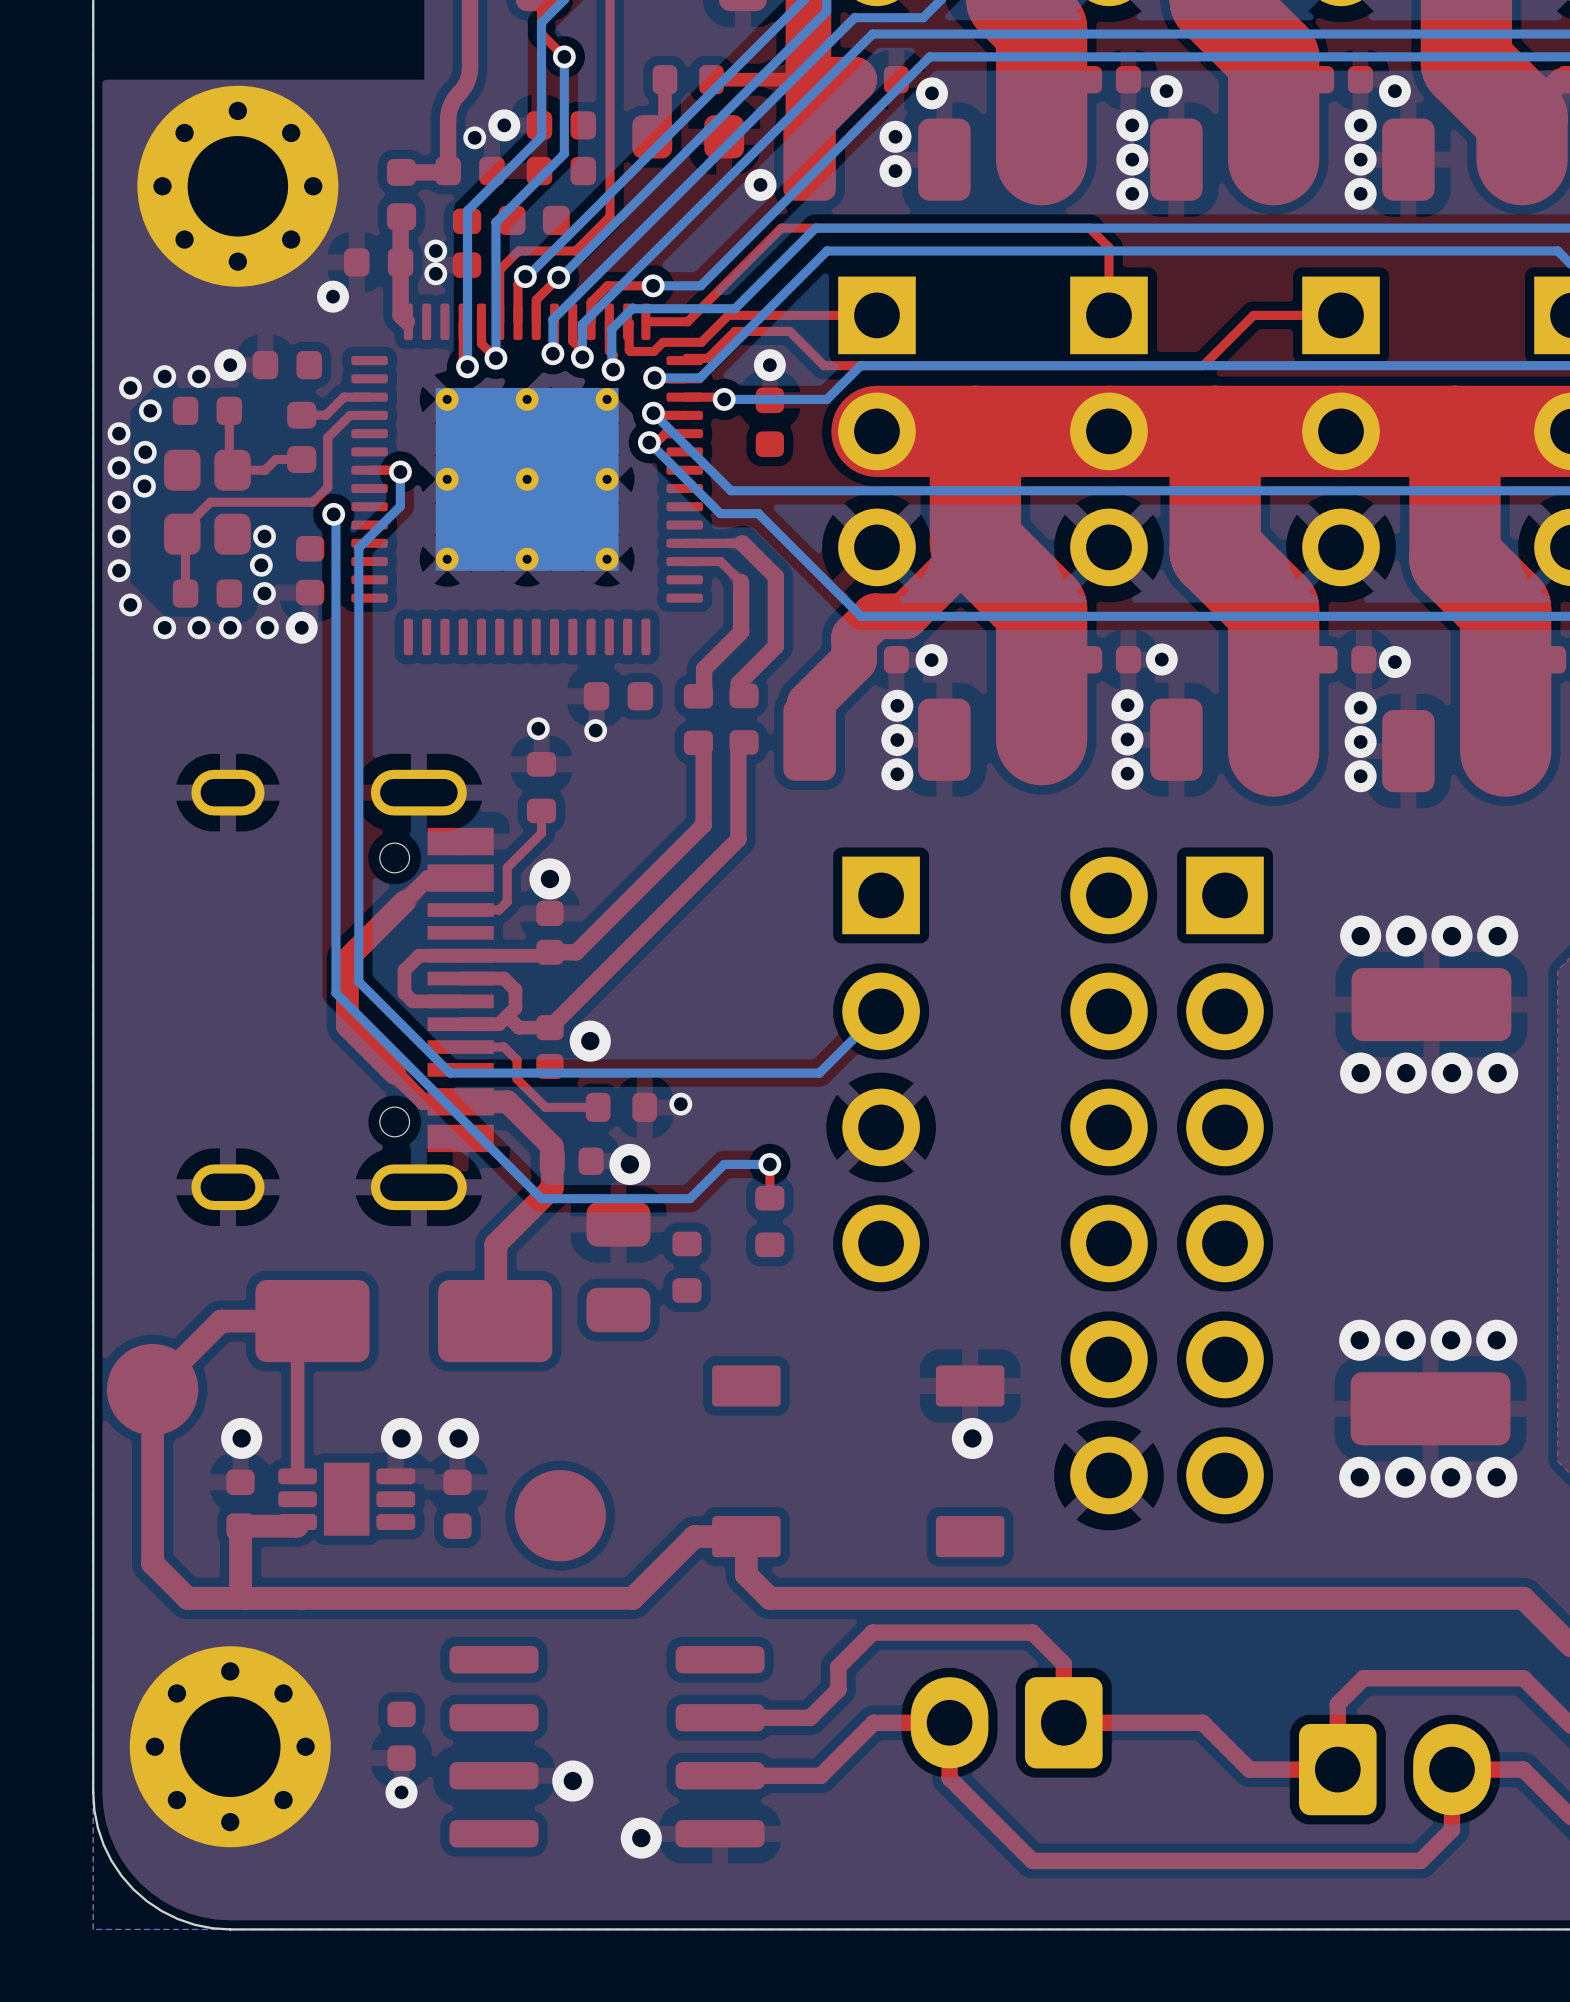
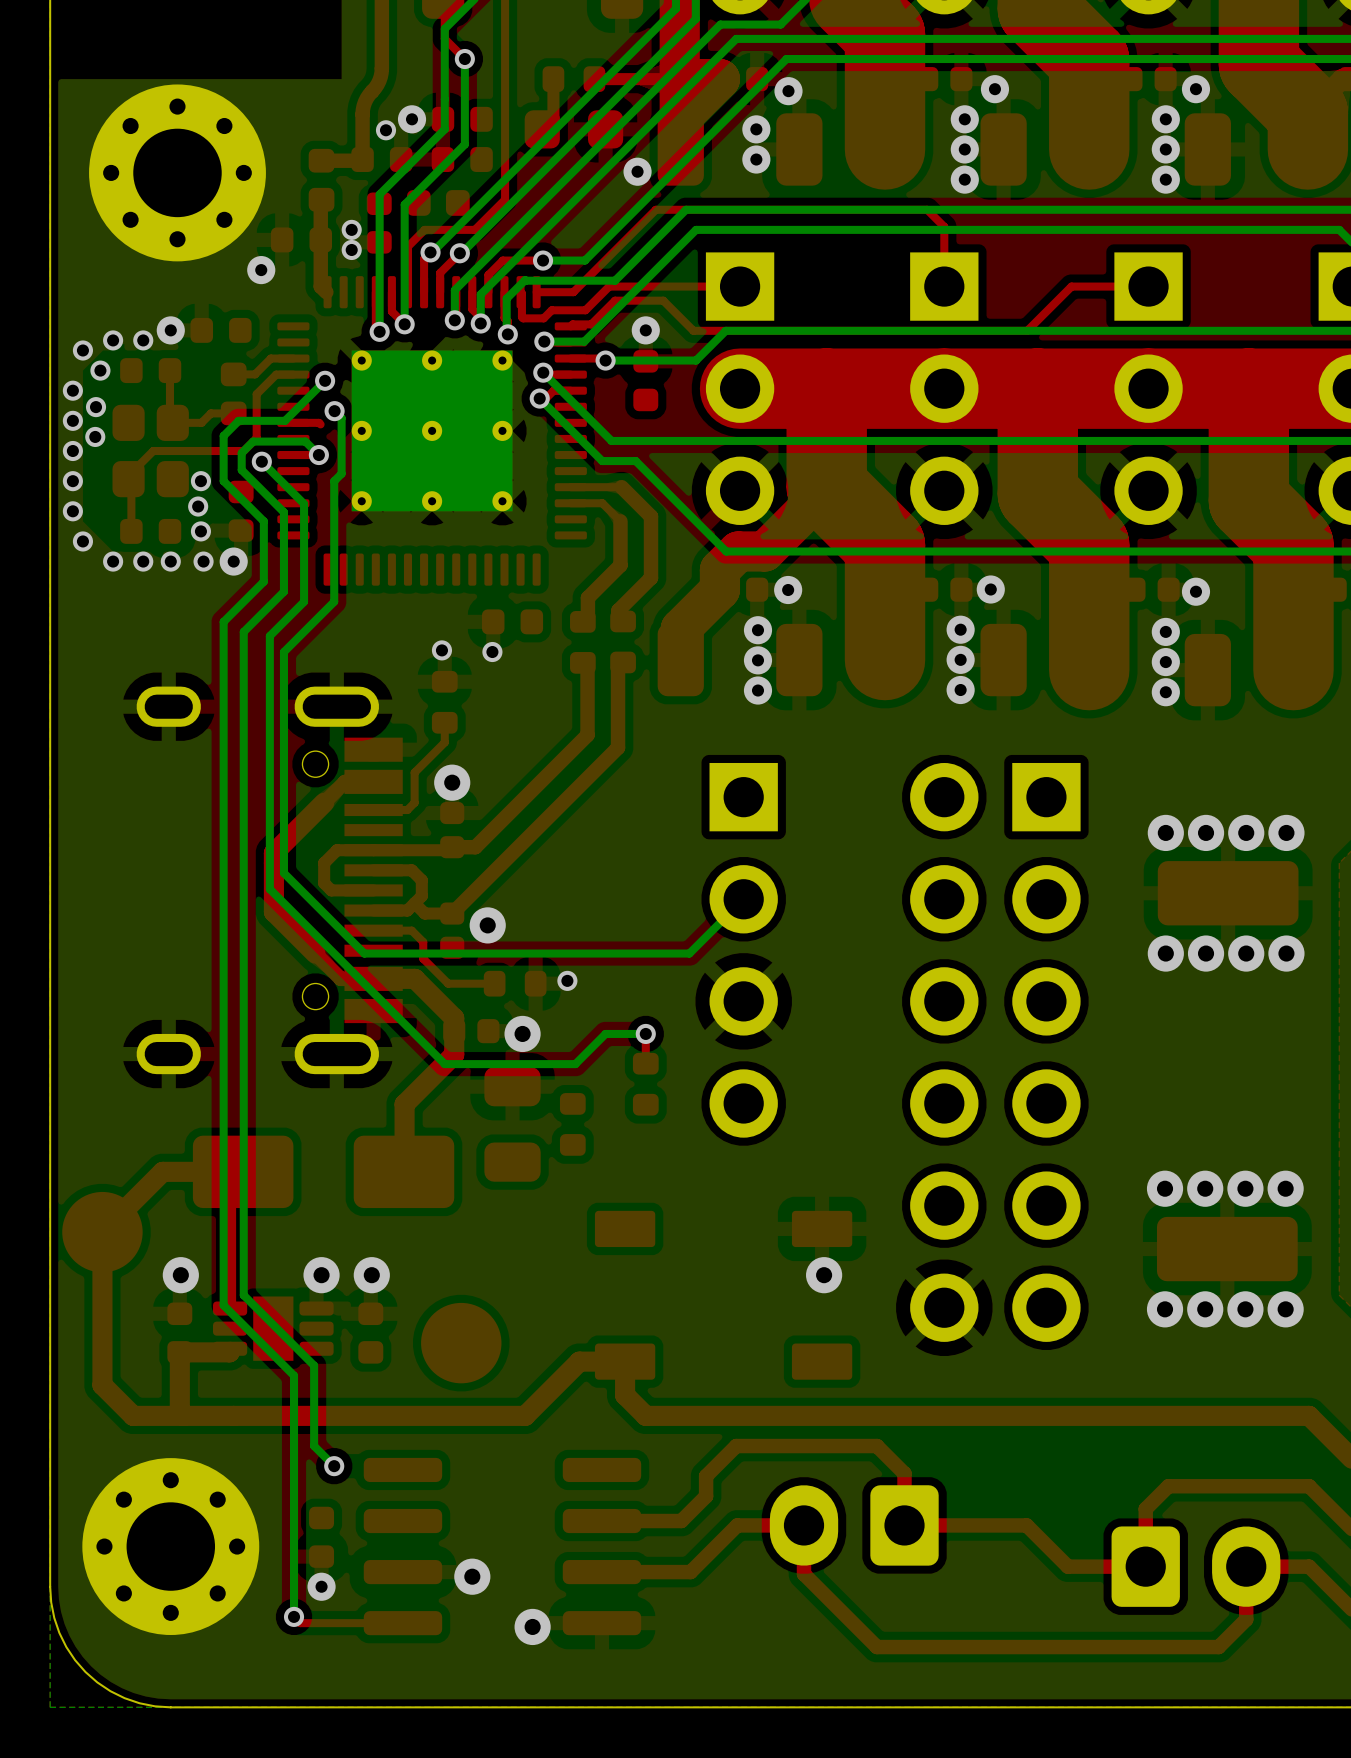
via: none -> (325, 380)
via position: (400, 471) -> (334, 411)
bottom track: (400, 472) (400, 506) (358, 547) (358, 571) -> (318, 455) (305, 441) (253, 441) (241, 453) (241, 470) (283, 512)
via: none -> (318, 455)
bottom track: (335, 516) (335, 582) -> (325, 380) (285, 420) (238, 420) (223, 435) (223, 481) (263, 521)
bottom track: (335, 650) (335, 993) (342, 999) -> (263, 463) (304, 503) (304, 601) (269, 636) (269, 889)
bottom track: none -> (263, 581) (223, 621) (223, 1305) (294, 1375) (294, 1616)
bottom track: (358, 662) (358, 730) -> (334, 411) (341, 418) (341, 473) (334, 481) (334, 601) (283, 652)
bottom track: none -> (283, 591) (243, 631) (243, 1295) (314, 1365) (314, 1446) (334, 1466)
via: none -> (334, 1466)
top track: none -> (294, 1616) (300, 1623) (402, 1623)
via: none -> (294, 1616)

